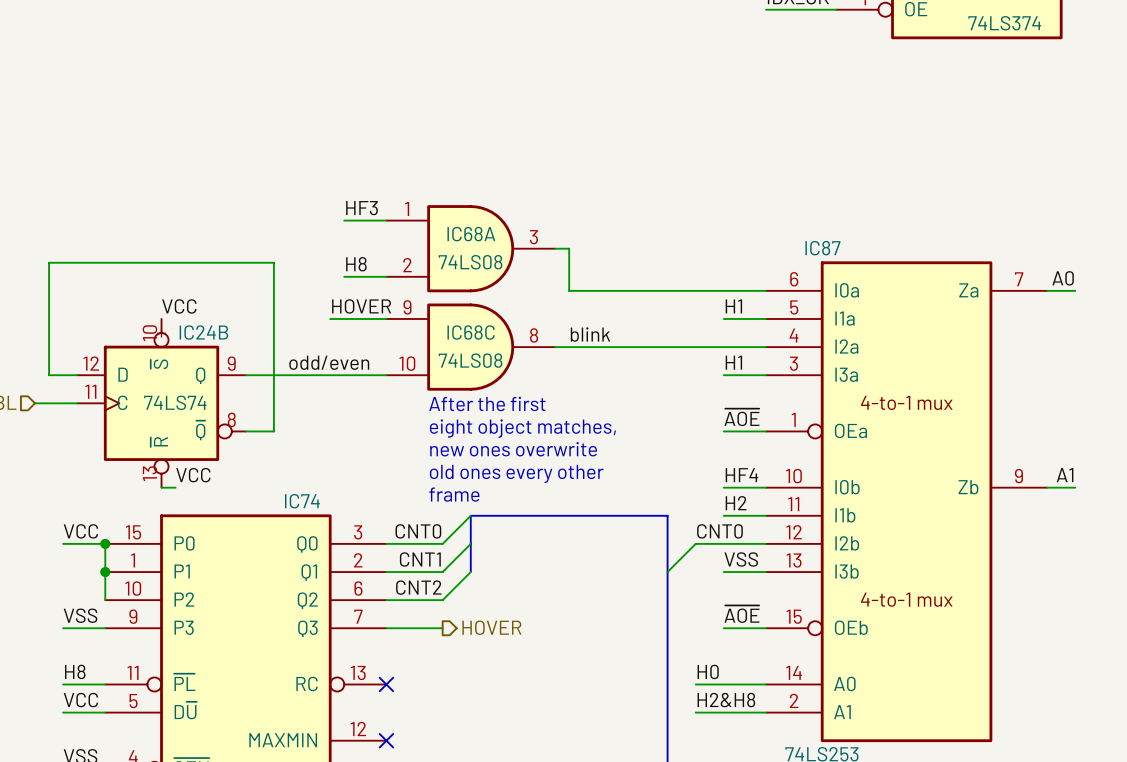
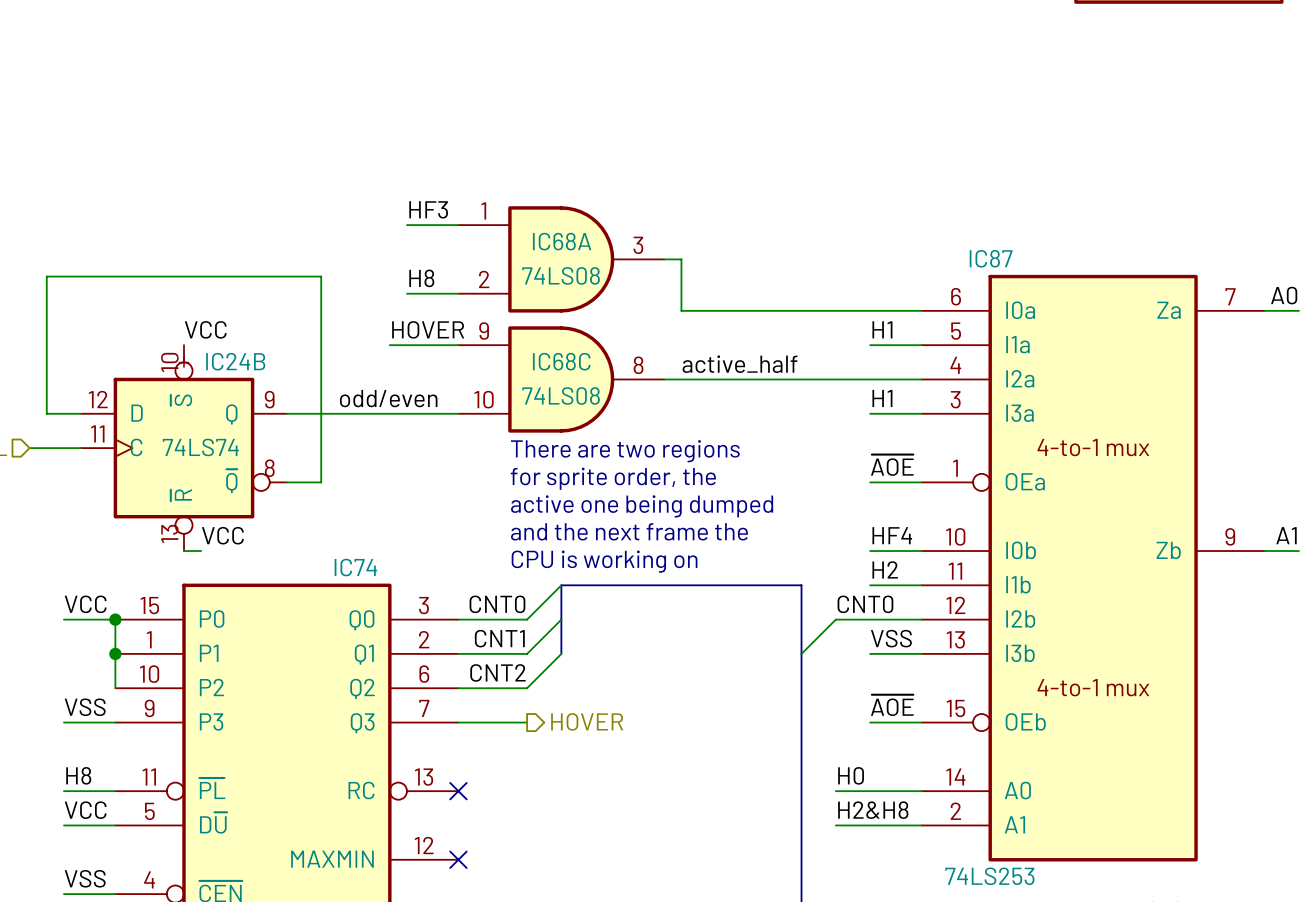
label: blink (590, 334) -> active_half (740, 364)
text: After the first (487, 403) -> There are two regions (625, 451)
text: eight object matches, (522, 428) -> for sprite order, the (613, 478)
text: new ones overwrite (513, 449) -> active one being dumped (642, 506)
text: old ones every other (516, 473) -> and the next frame the (629, 531)
text: frame (454, 494) -> CPU is working on (604, 561)

